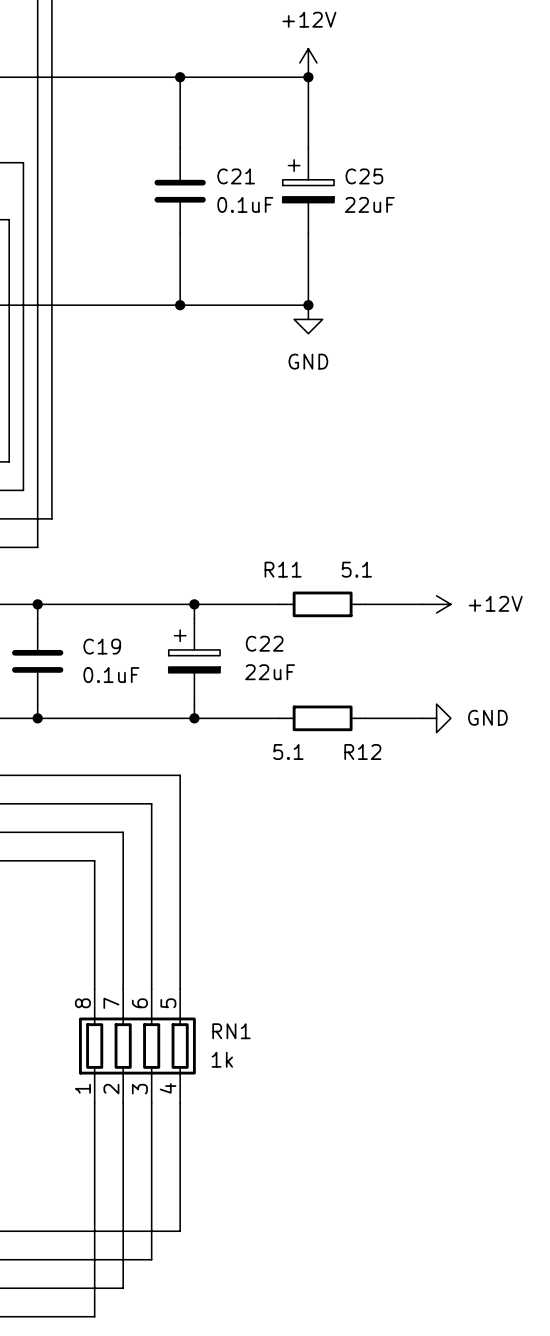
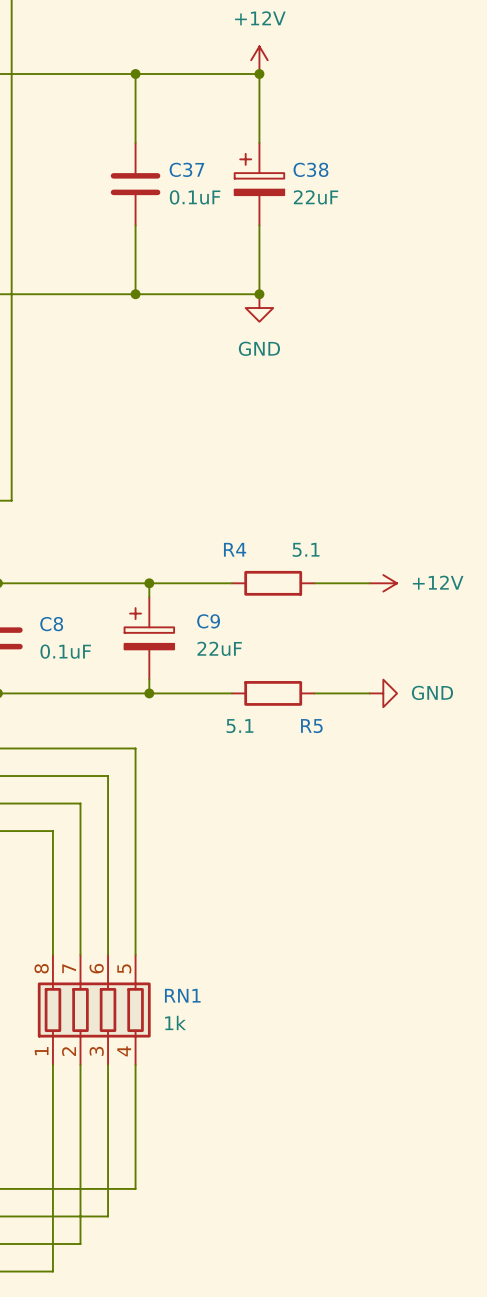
C21 name: C21 (236, 176) -> C37 (186, 169)
C25 name: C25 (364, 176) -> C38 (310, 169)
R11 name: R11 (283, 569) -> R4 (235, 549)
C22 name: C22 (264, 643) -> C9 (208, 621)
C19 name: C19 (102, 646) -> C8 (51, 624)
R12 name: R12 (362, 752) -> R5 (311, 726)

